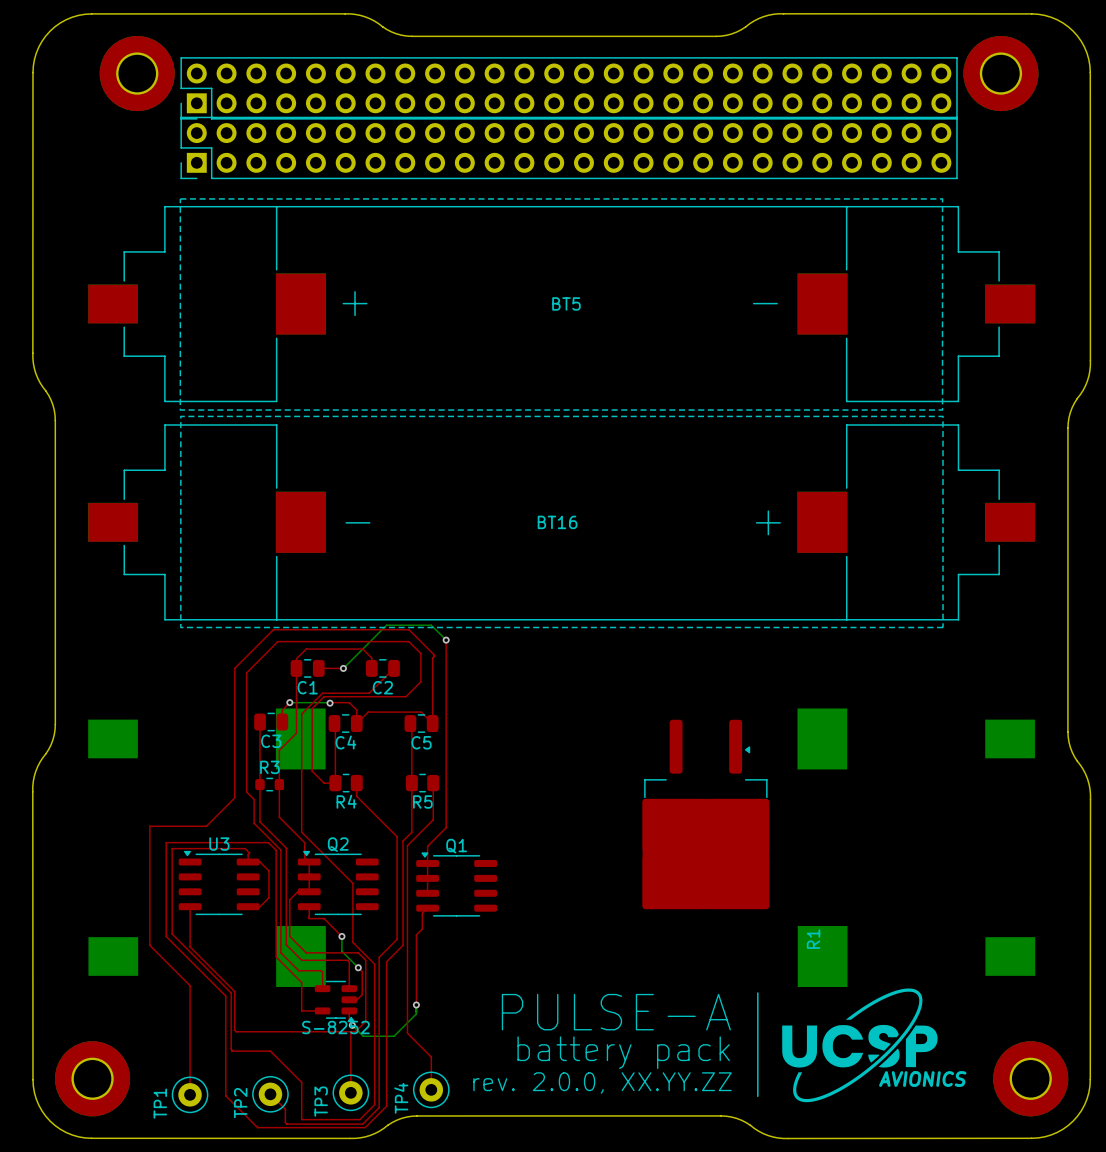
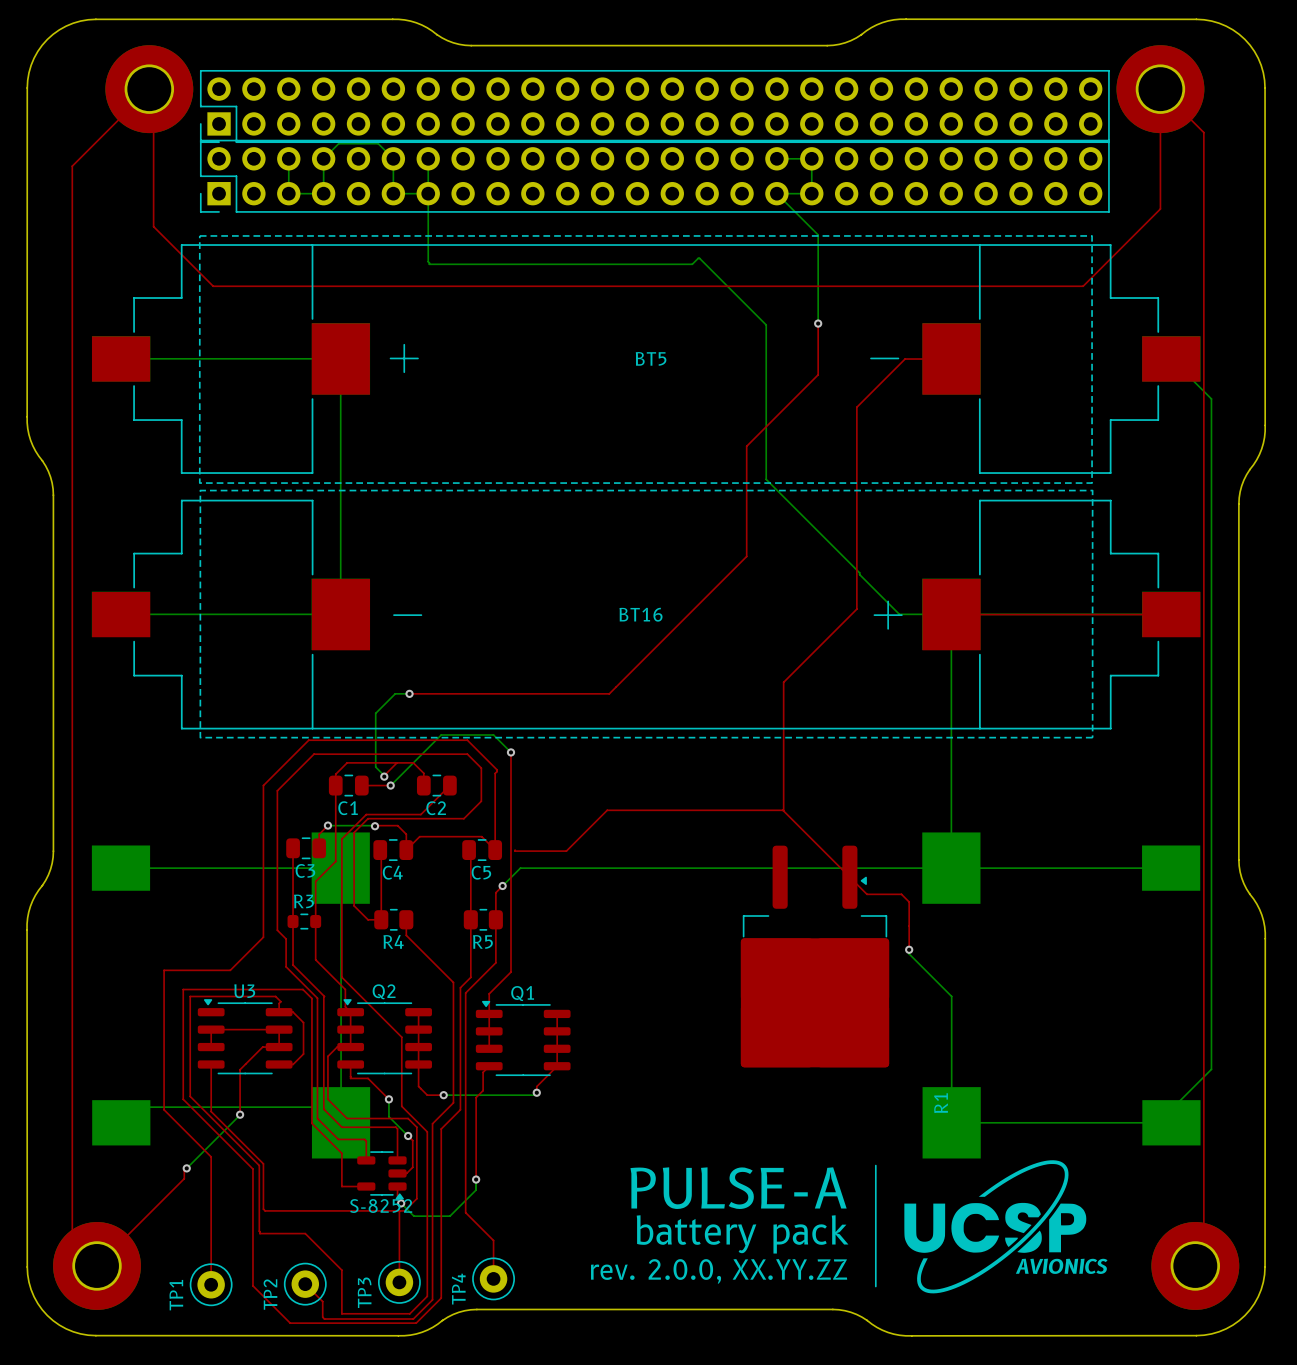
bottom track: none -> (288, 158) (288, 193) (323, 193) (323, 158) (338, 143) (378, 143) (393, 158) (393, 193) (428, 193)
bottom track: none -> (428, 158) (429, 264) (692, 264) (699, 258) (766, 324) (766, 479) (899, 614) (1171, 614)
bottom track: none -> (776, 158) (811, 158) (811, 193) (776, 193) (818, 234) (818, 323)
top track: none -> (818, 323) (818, 374) (746, 446) (746, 556) (609, 693) (409, 693)
via: none -> (818, 323)
bottom track: none -> (121, 358) (340, 358) (340, 614) (120, 614)
bottom track: none -> (1171, 358) (1211, 398) (1211, 1069) (1171, 1109) (1171, 1122) (951, 1122) (951, 996) (909, 953) (909, 949)
top track: none -> (951, 359) (905, 359) (856, 407) (856, 609) (783, 682) (783, 811)
top track: none -> (951, 614) (1171, 614)
bottom track: none -> (951, 614) (951, 868)
bottom track: none -> (409, 693) (395, 693) (375, 713) (375, 767) (384, 776)
via: none -> (409, 693)
top track: none -> (396, 762) (384, 776)
via: none -> (384, 776)
top track: none -> (515, 850) (566, 851) (607, 810) (782, 810) (866, 894) (901, 894) (909, 902) (909, 949)
bottom track: none -> (120, 868) (341, 868) (341, 1122) (325, 1107) (136, 1107) (121, 1122)
bottom track: none -> (1171, 868) (520, 868) (502, 885)
top track: none -> (502, 885) (495, 892) (495, 919)
via: none -> (502, 885)
via: none -> (909, 949)
top track: none -> (418, 1012) (418, 1086) (427, 1095) (443, 1095)
top track: none -> (557, 1013) (557, 1066) (536, 1086) (536, 1092)
top track: none -> (211, 1047) (211, 1029) (279, 1029) (279, 1047) (262, 1047) (240, 1069) (240, 1114)
bottom track: none -> (536, 1092) (534, 1095) (443, 1095)
via: none -> (536, 1092)
via: none -> (443, 1095)
bottom track: none -> (240, 1114) (186, 1168)
via: none -> (240, 1114)
top track: none -> (186, 1168) (184, 1170) (184, 1178) (97, 1265) (72, 1241) (72, 166) (149, 89) (153, 93) (153, 226) (213, 286) (1083, 286) (1160, 208) (1160, 89) (1203, 132) (1203, 1257) (1195, 1265)
via: none -> (186, 1168)

